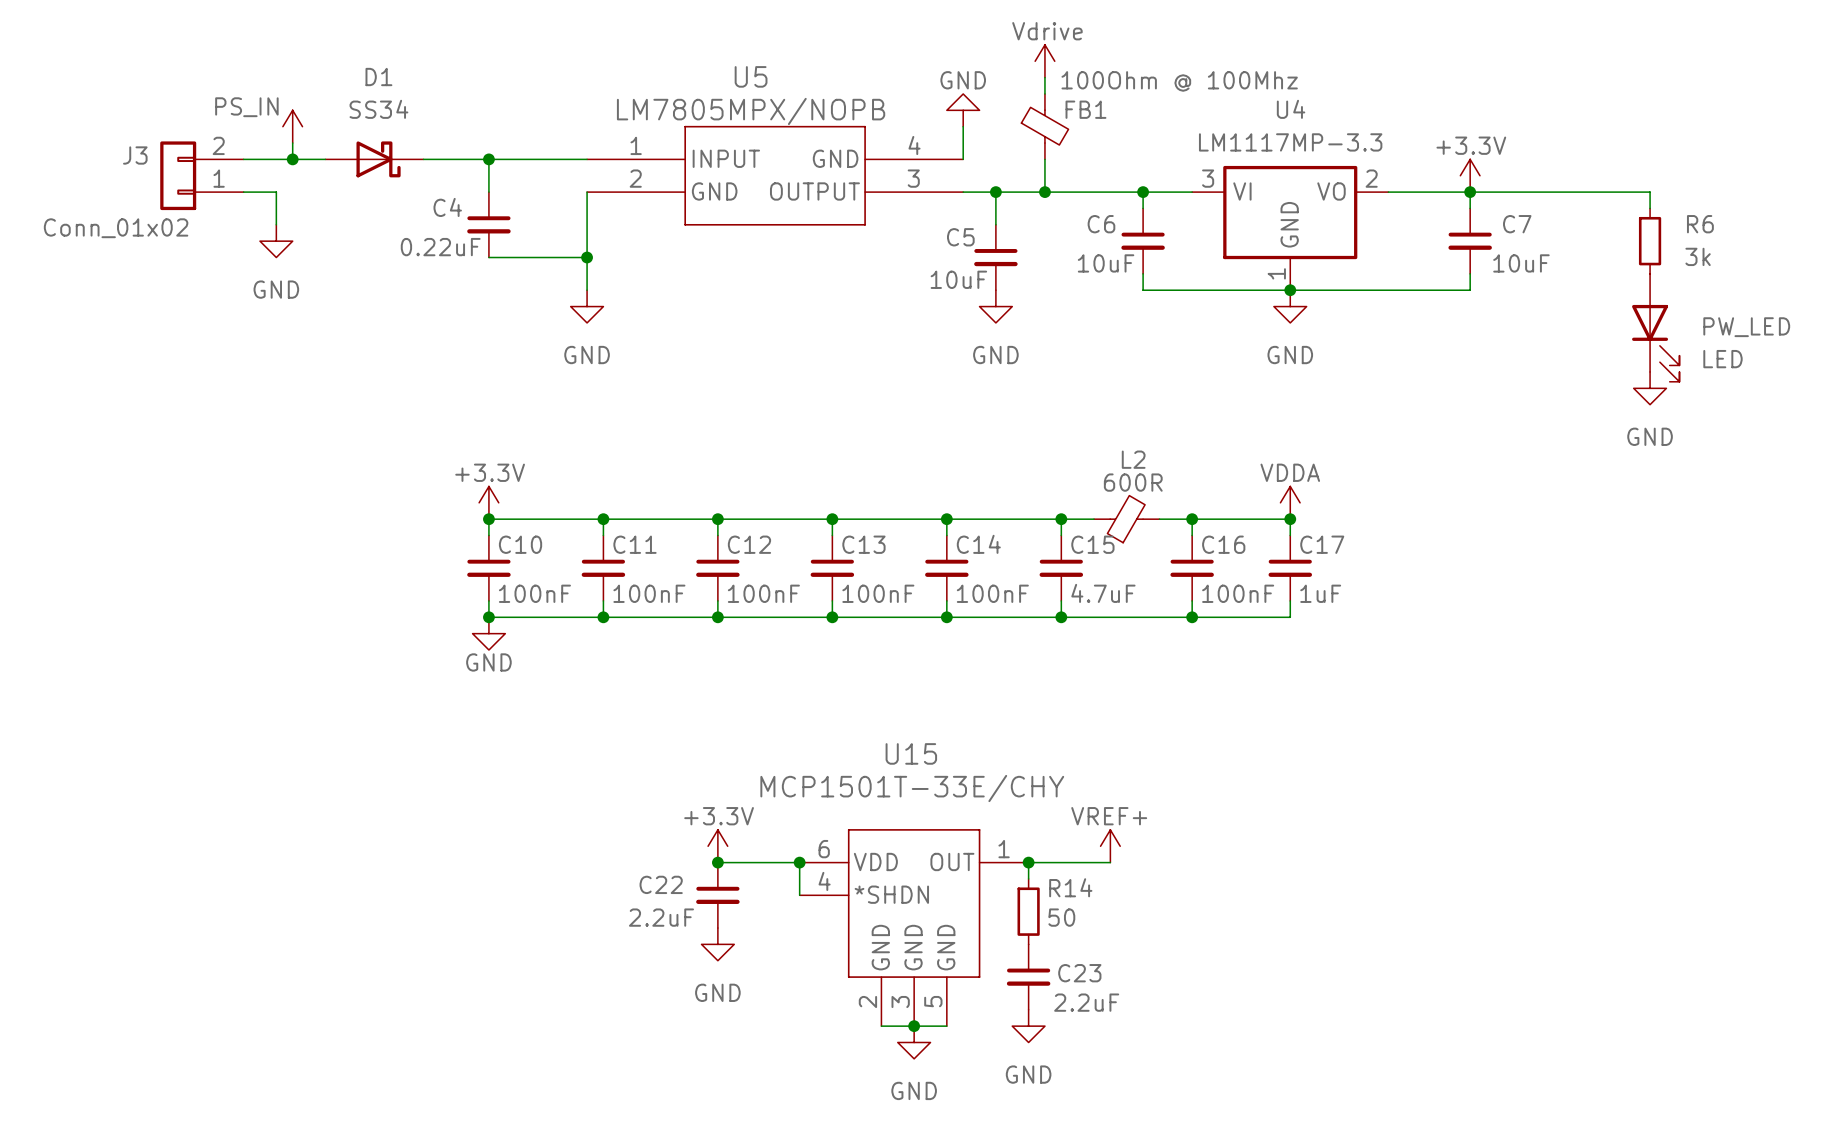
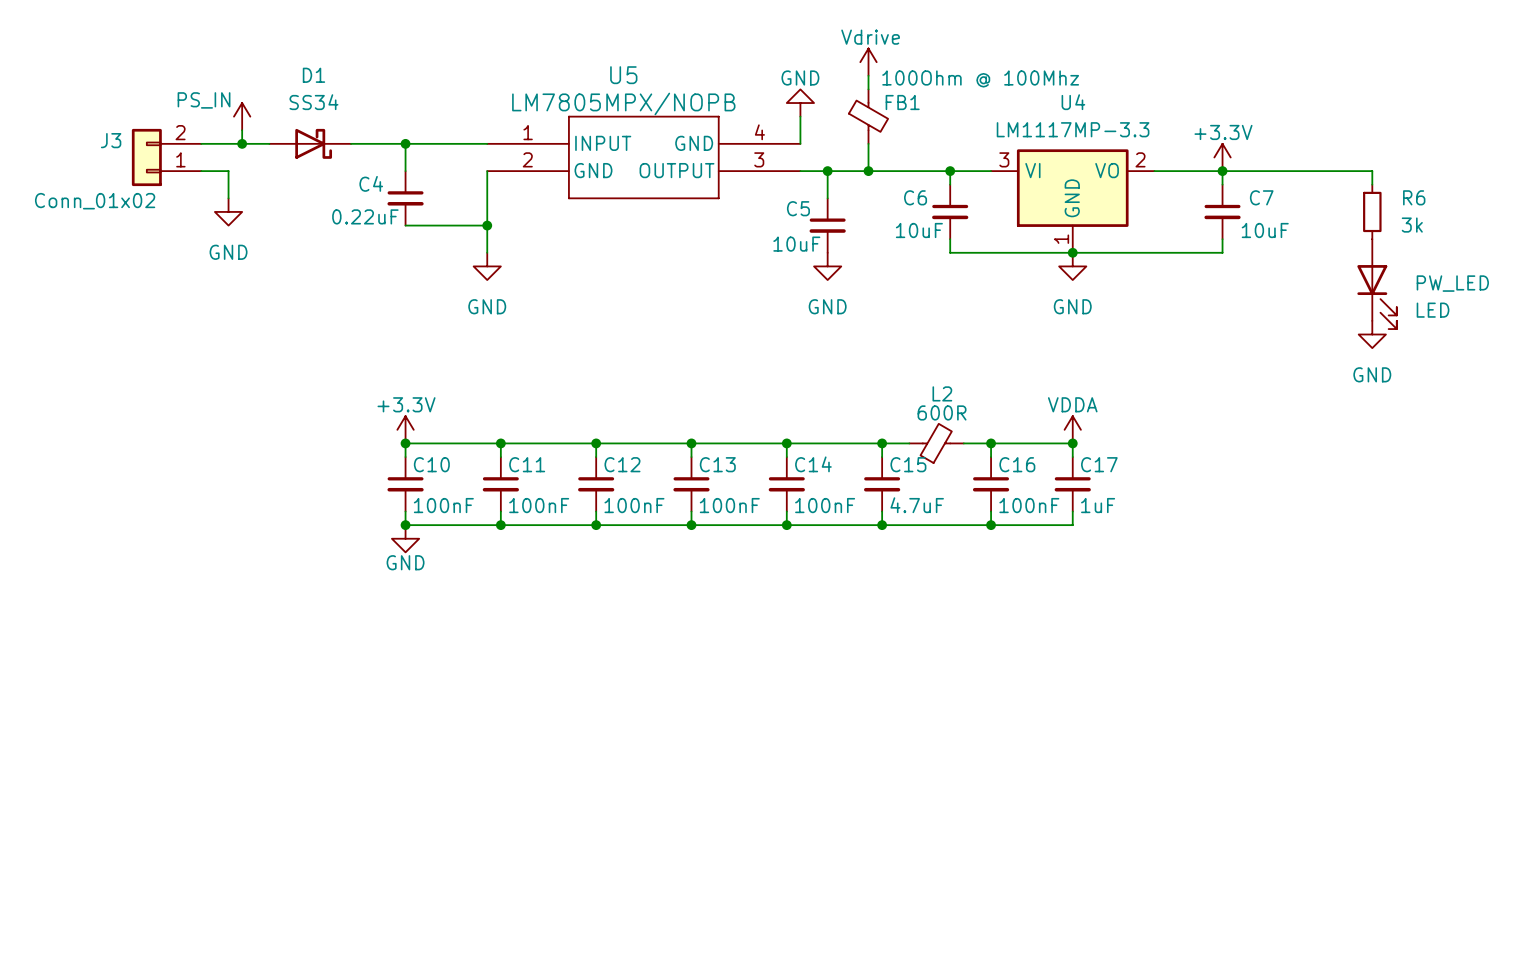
power symbol: +3.3V (717, 846) -> none
power symbol: VREF+ (1110, 846) -> none
wire: (717, 862) (799, 862) (799, 895) -> none
junction: (717, 862) -> none
junction: (799, 862) -> none
junction: (1028, 862) -> none
wire: (1110, 862) (1028, 862) (1028, 878) -> none
C22: 2.2uF (717, 895) -> none
R14: 50 (1028, 911) -> none
U15: MCP1501T-33E/CHY (914, 927) -> none
power symbol: GND (717, 944) -> none
C23: 2.2uF (1028, 977) -> none
wire: (881, 1026) (946, 1026) -> none
junction: (914, 1026) -> none
power symbol: GND (1028, 1026) -> none
power symbol: GND (914, 1042) -> none

